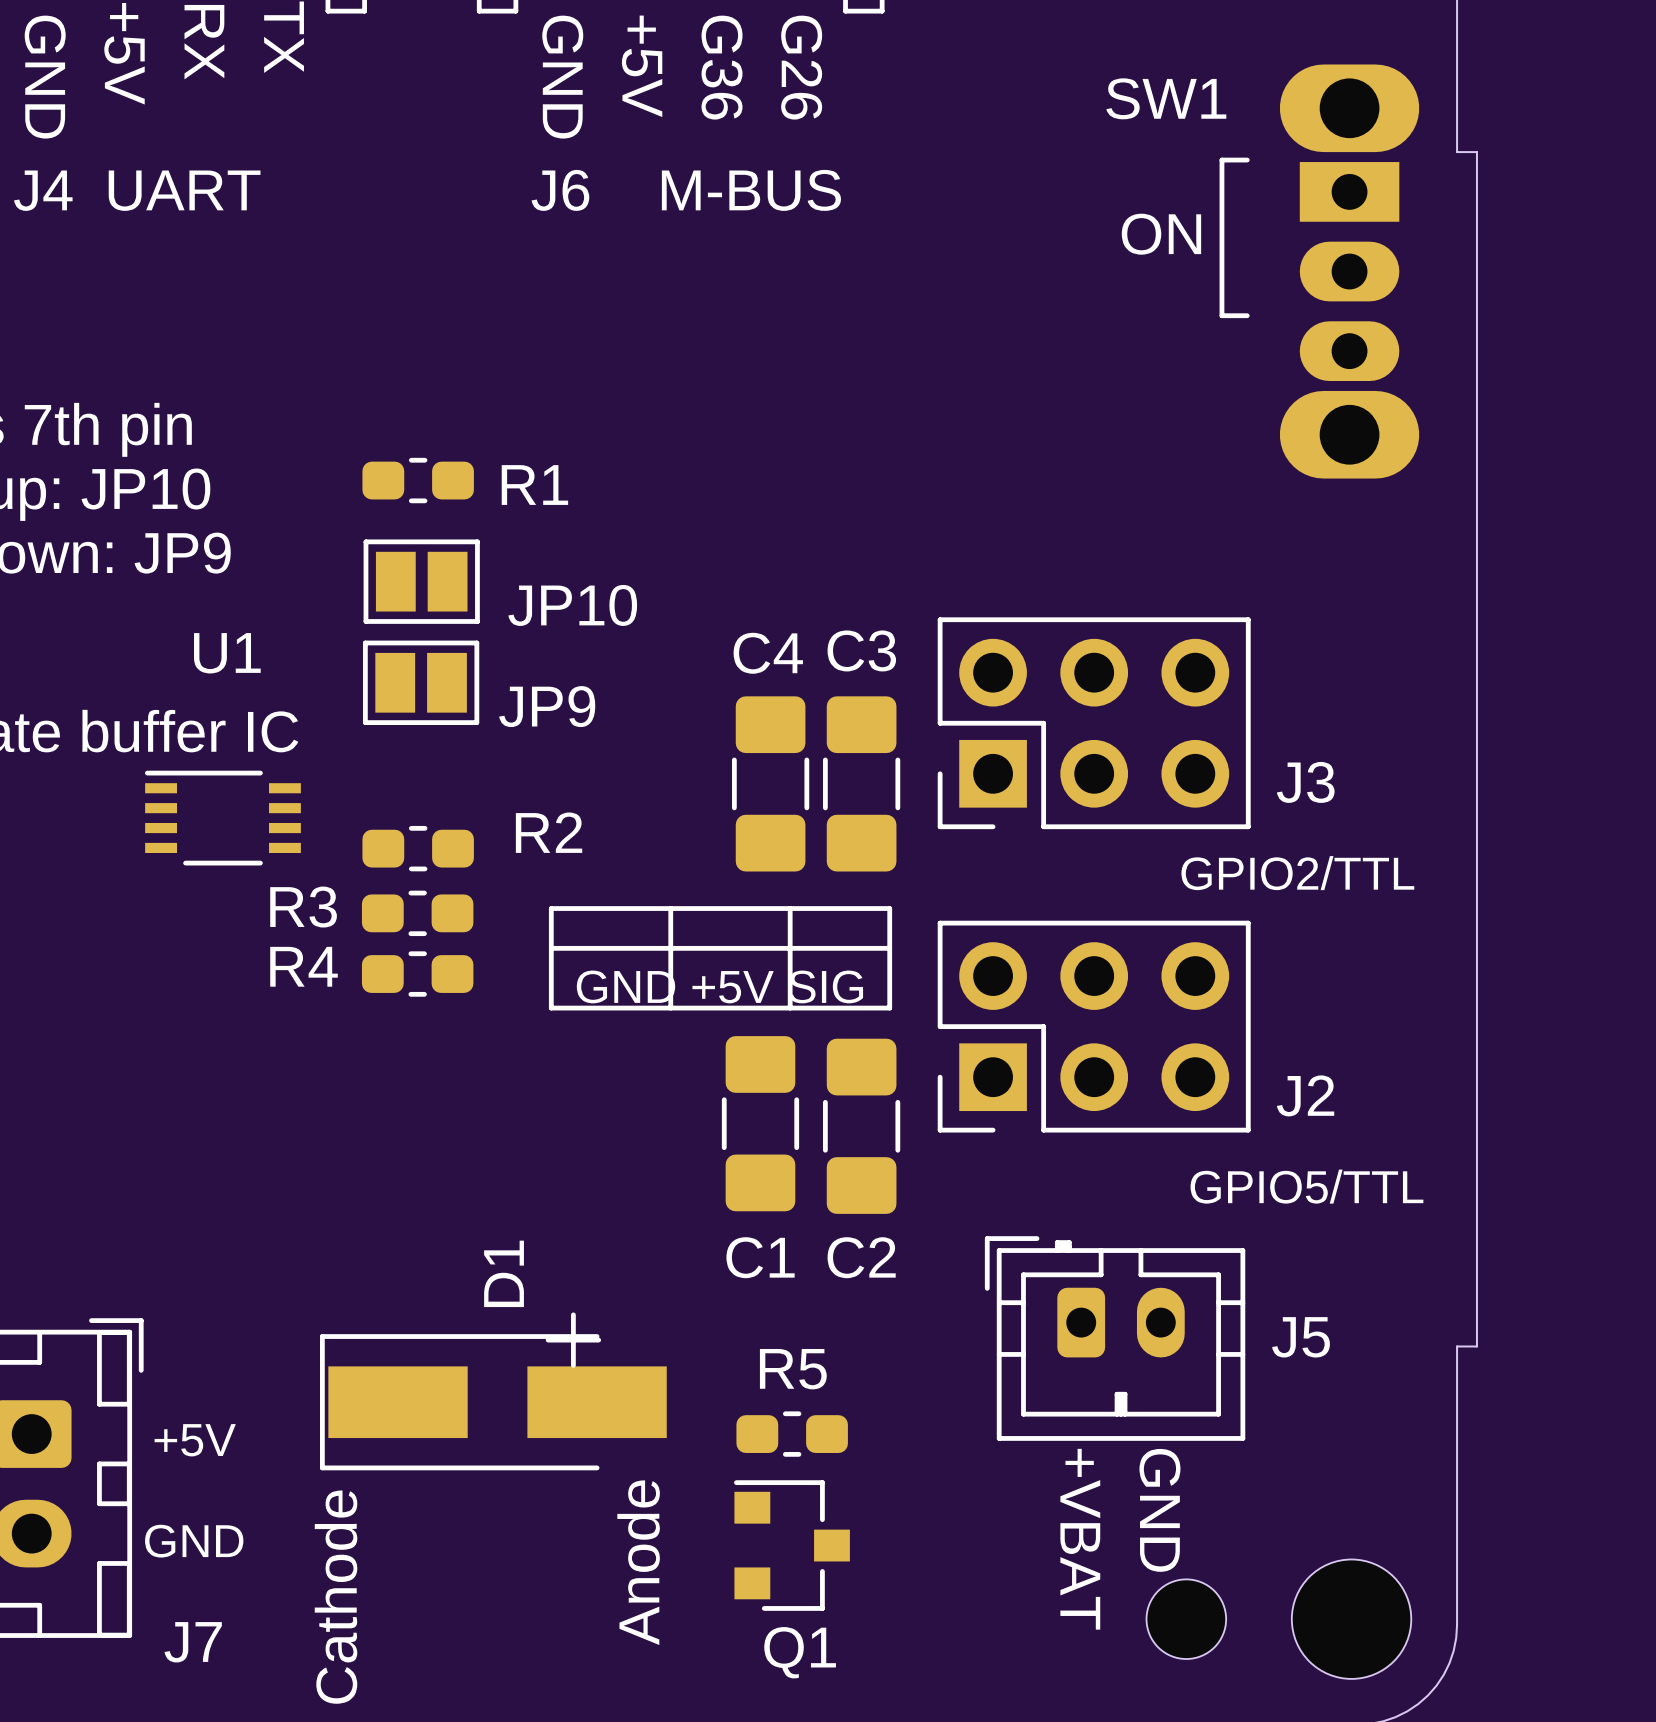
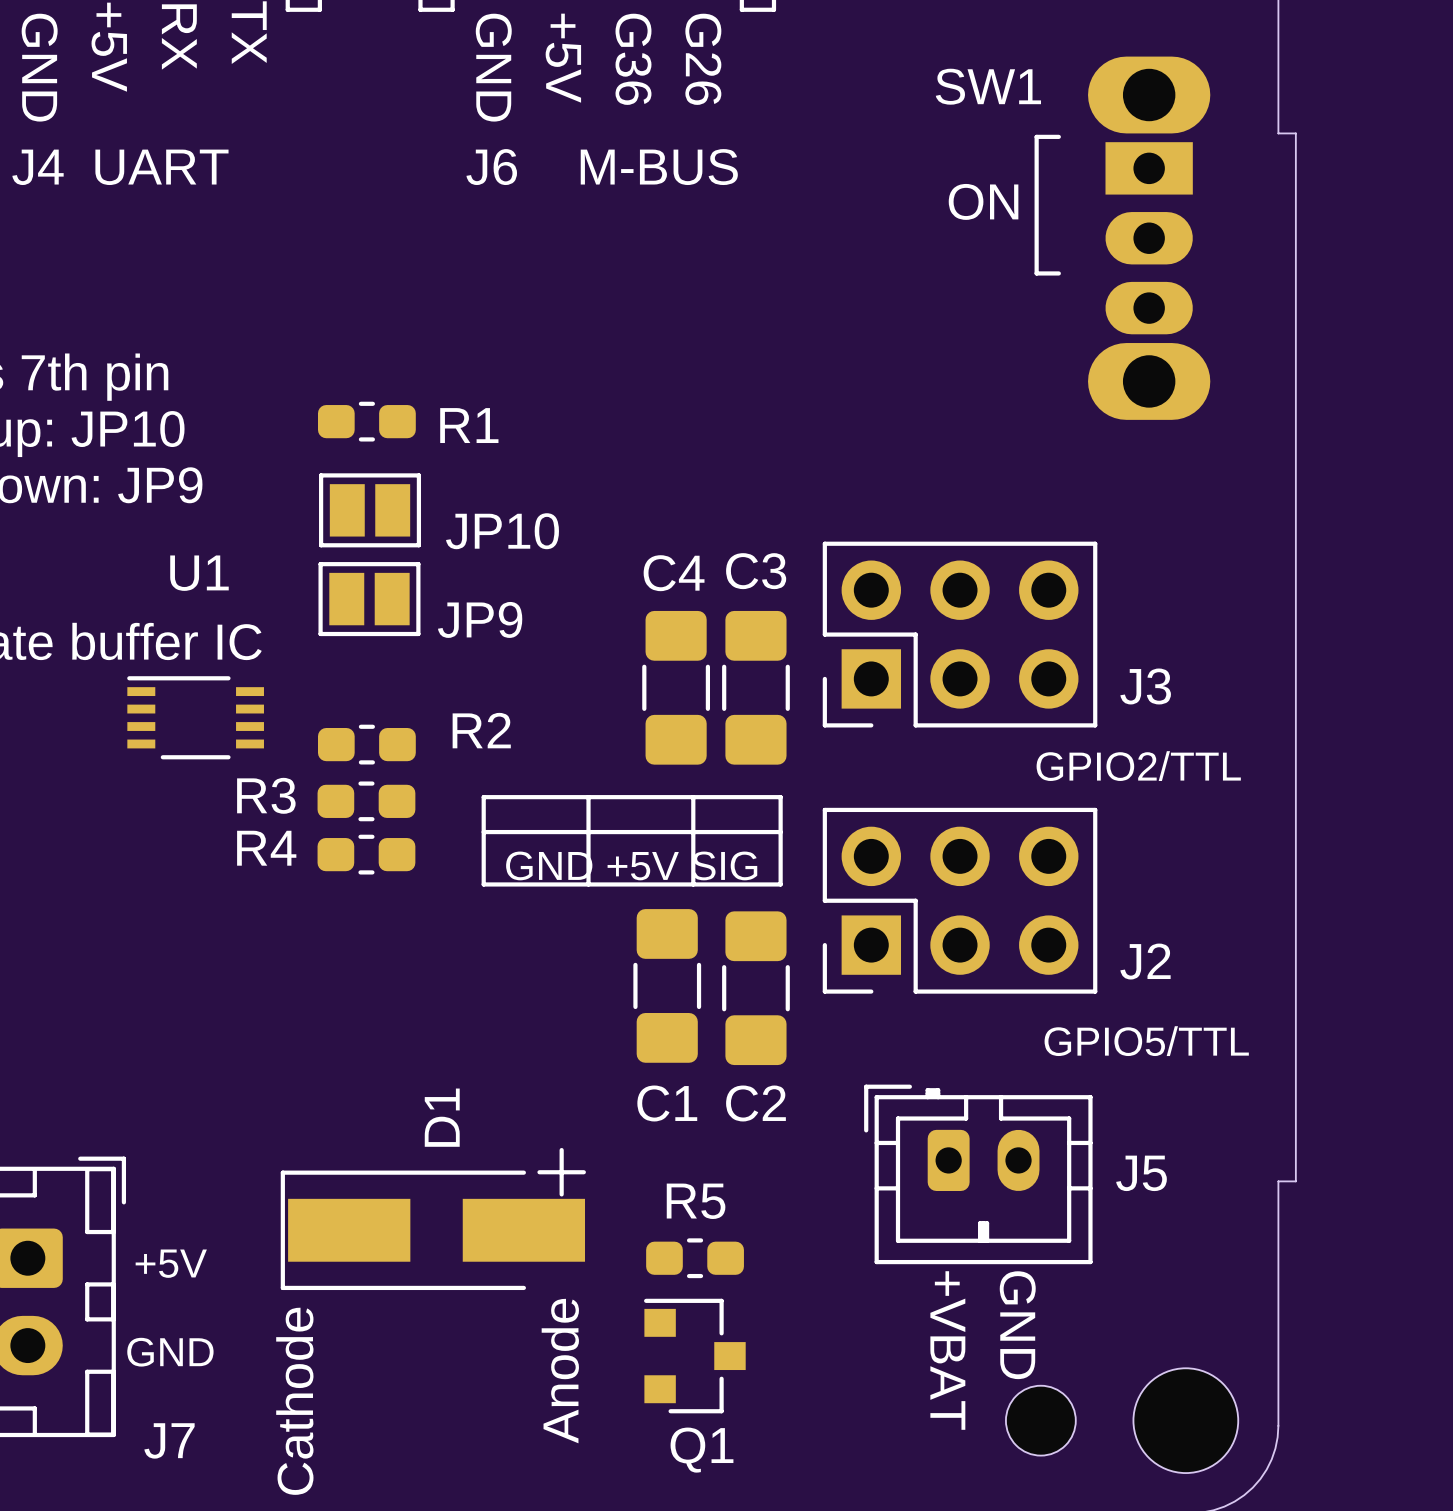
line: (1247, 160) (1221, 160) (1221, 315) (1247, 315) -> (1058, 136) (1036, 136) (1036, 273) (1058, 273)
text position: ON (1161, 234) -> ON (983, 201)
SW1 position: (1349, 271) -> (1149, 238)
line: (573, 1314) (573, 1365) -> (561, 1150) (561, 1194)
line: (548, 1340) (598, 1340) -> (539, 1172) (583, 1172)

